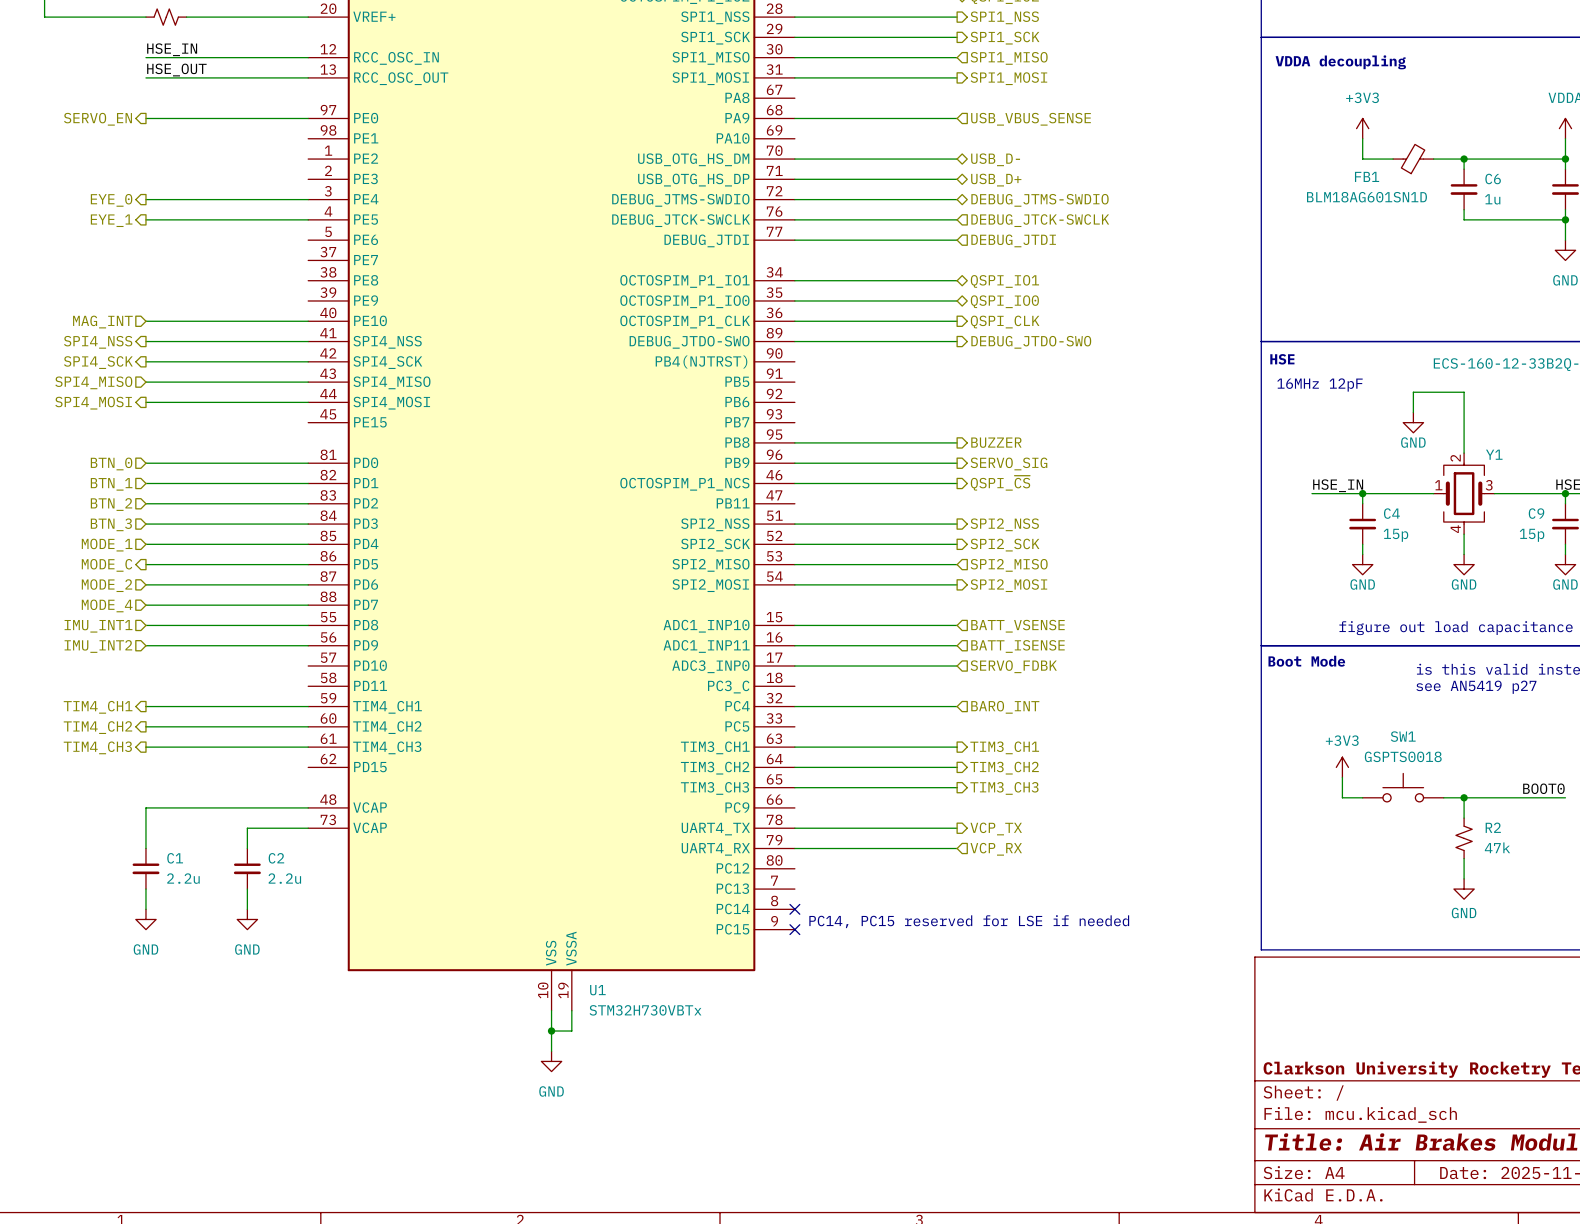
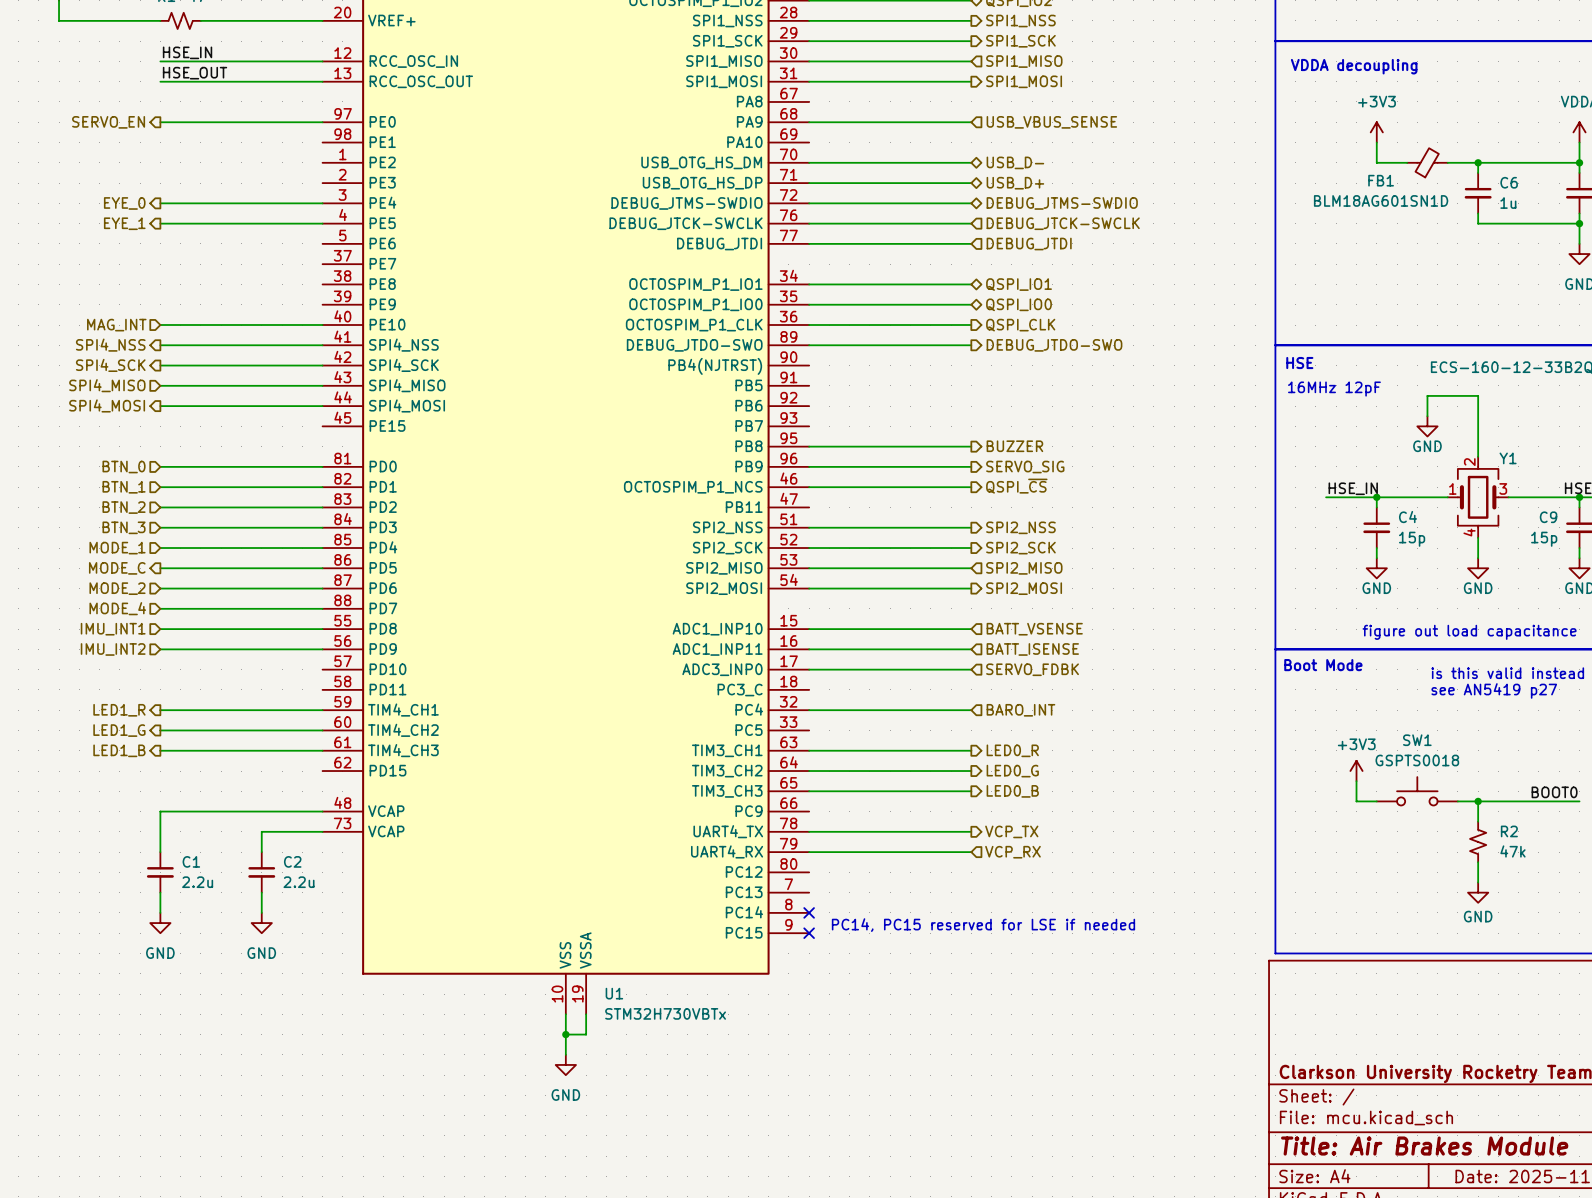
hierarchical label: TIM4_CH1 (98, 707) -> LED1_R (119, 710)
hierarchical label: TIM4_CH2 (97, 727) -> LED1_G (119, 730)
hierarchical label: TIM4_CH3 (97, 747) -> LED1_B (119, 750)
hierarchical label: TIM3_CH1 (1004, 747) -> LED0_R (1012, 750)
hierarchical label: TIM3_CH2 (1004, 768) -> LED0_G (1012, 771)
hierarchical label: TIM3_CH3 (1004, 788) -> LED0_B (1012, 791)

